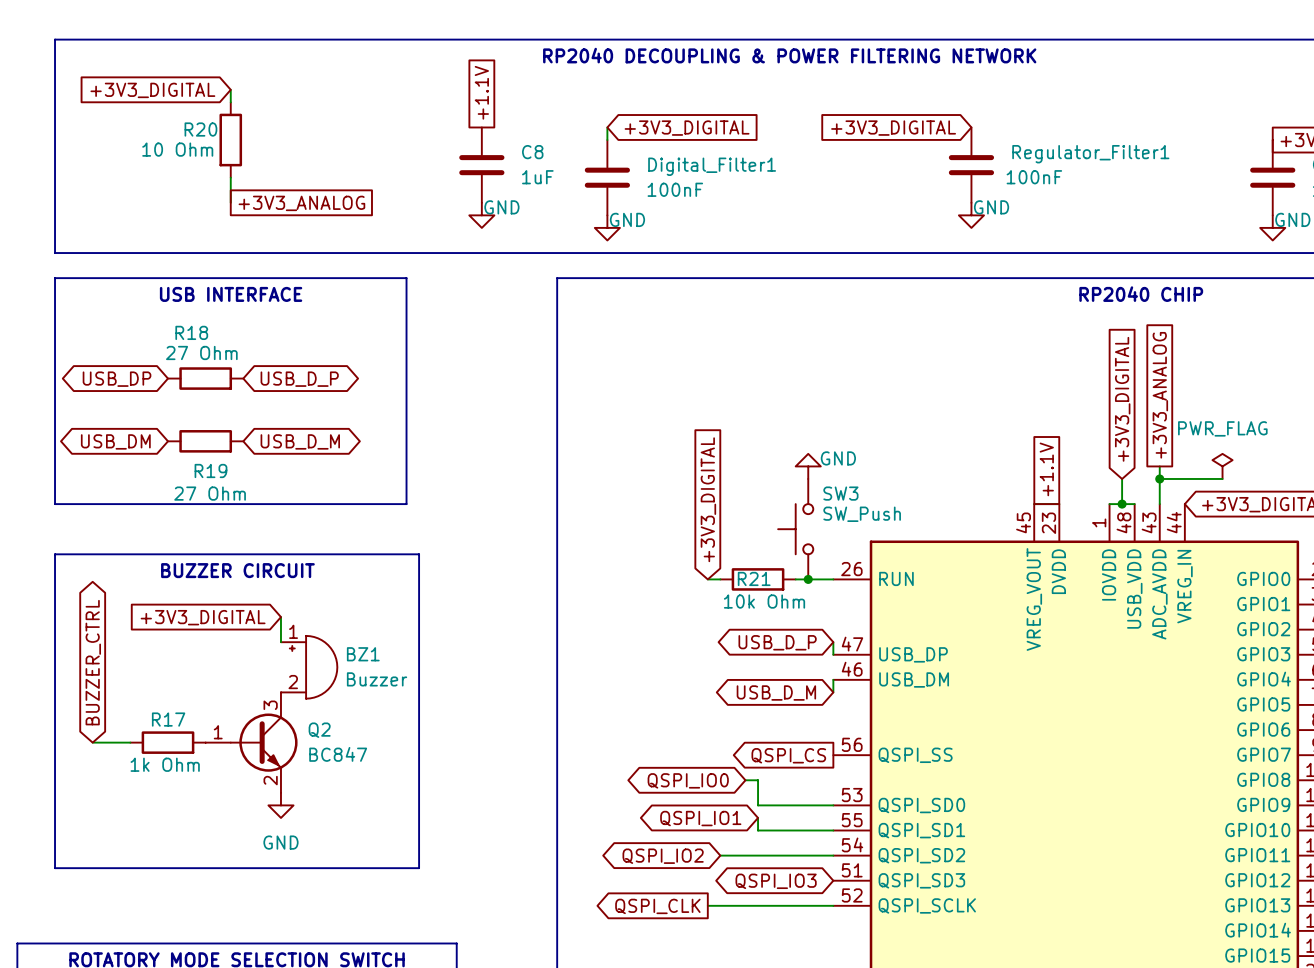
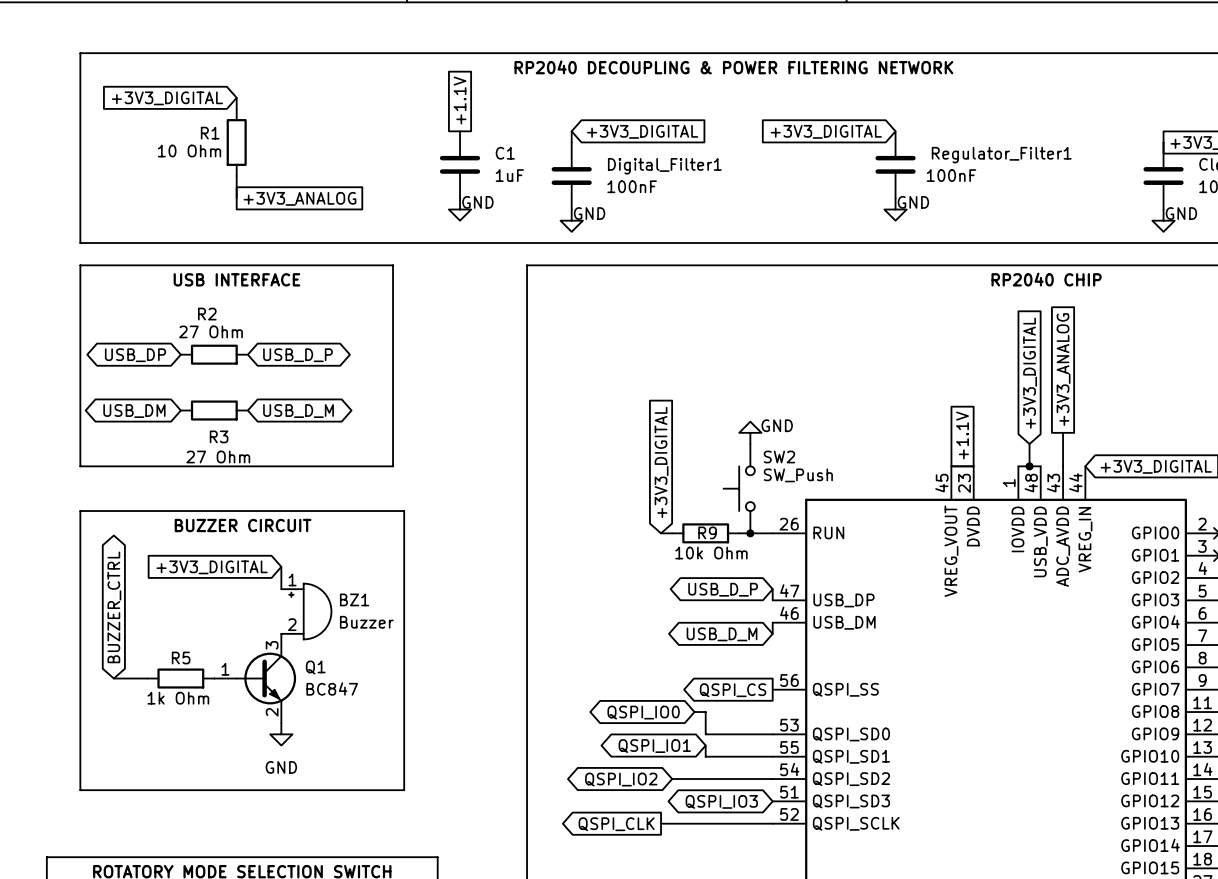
R20 name: R20 (200, 129) -> R1 (210, 133)
C8 name: C8 (532, 152) -> C1 (505, 153)
R18 name: R18 (191, 332) -> R2 (207, 314)
power symbol: PWR_FLAG (1222, 466) -> none
R19 name: R19 (210, 470) -> R3 (219, 436)
wire: (1159, 478) (1222, 478) -> none
junction: (1159, 478) -> none
SW3 name: SW3 (840, 493) -> SW2 (779, 457)
R21 name: R21 (754, 578) -> R9 (707, 532)
R17 name: R17 (168, 719) -> R5 (181, 658)
Q2 name: Q2 (319, 730) -> Q1 (315, 667)

